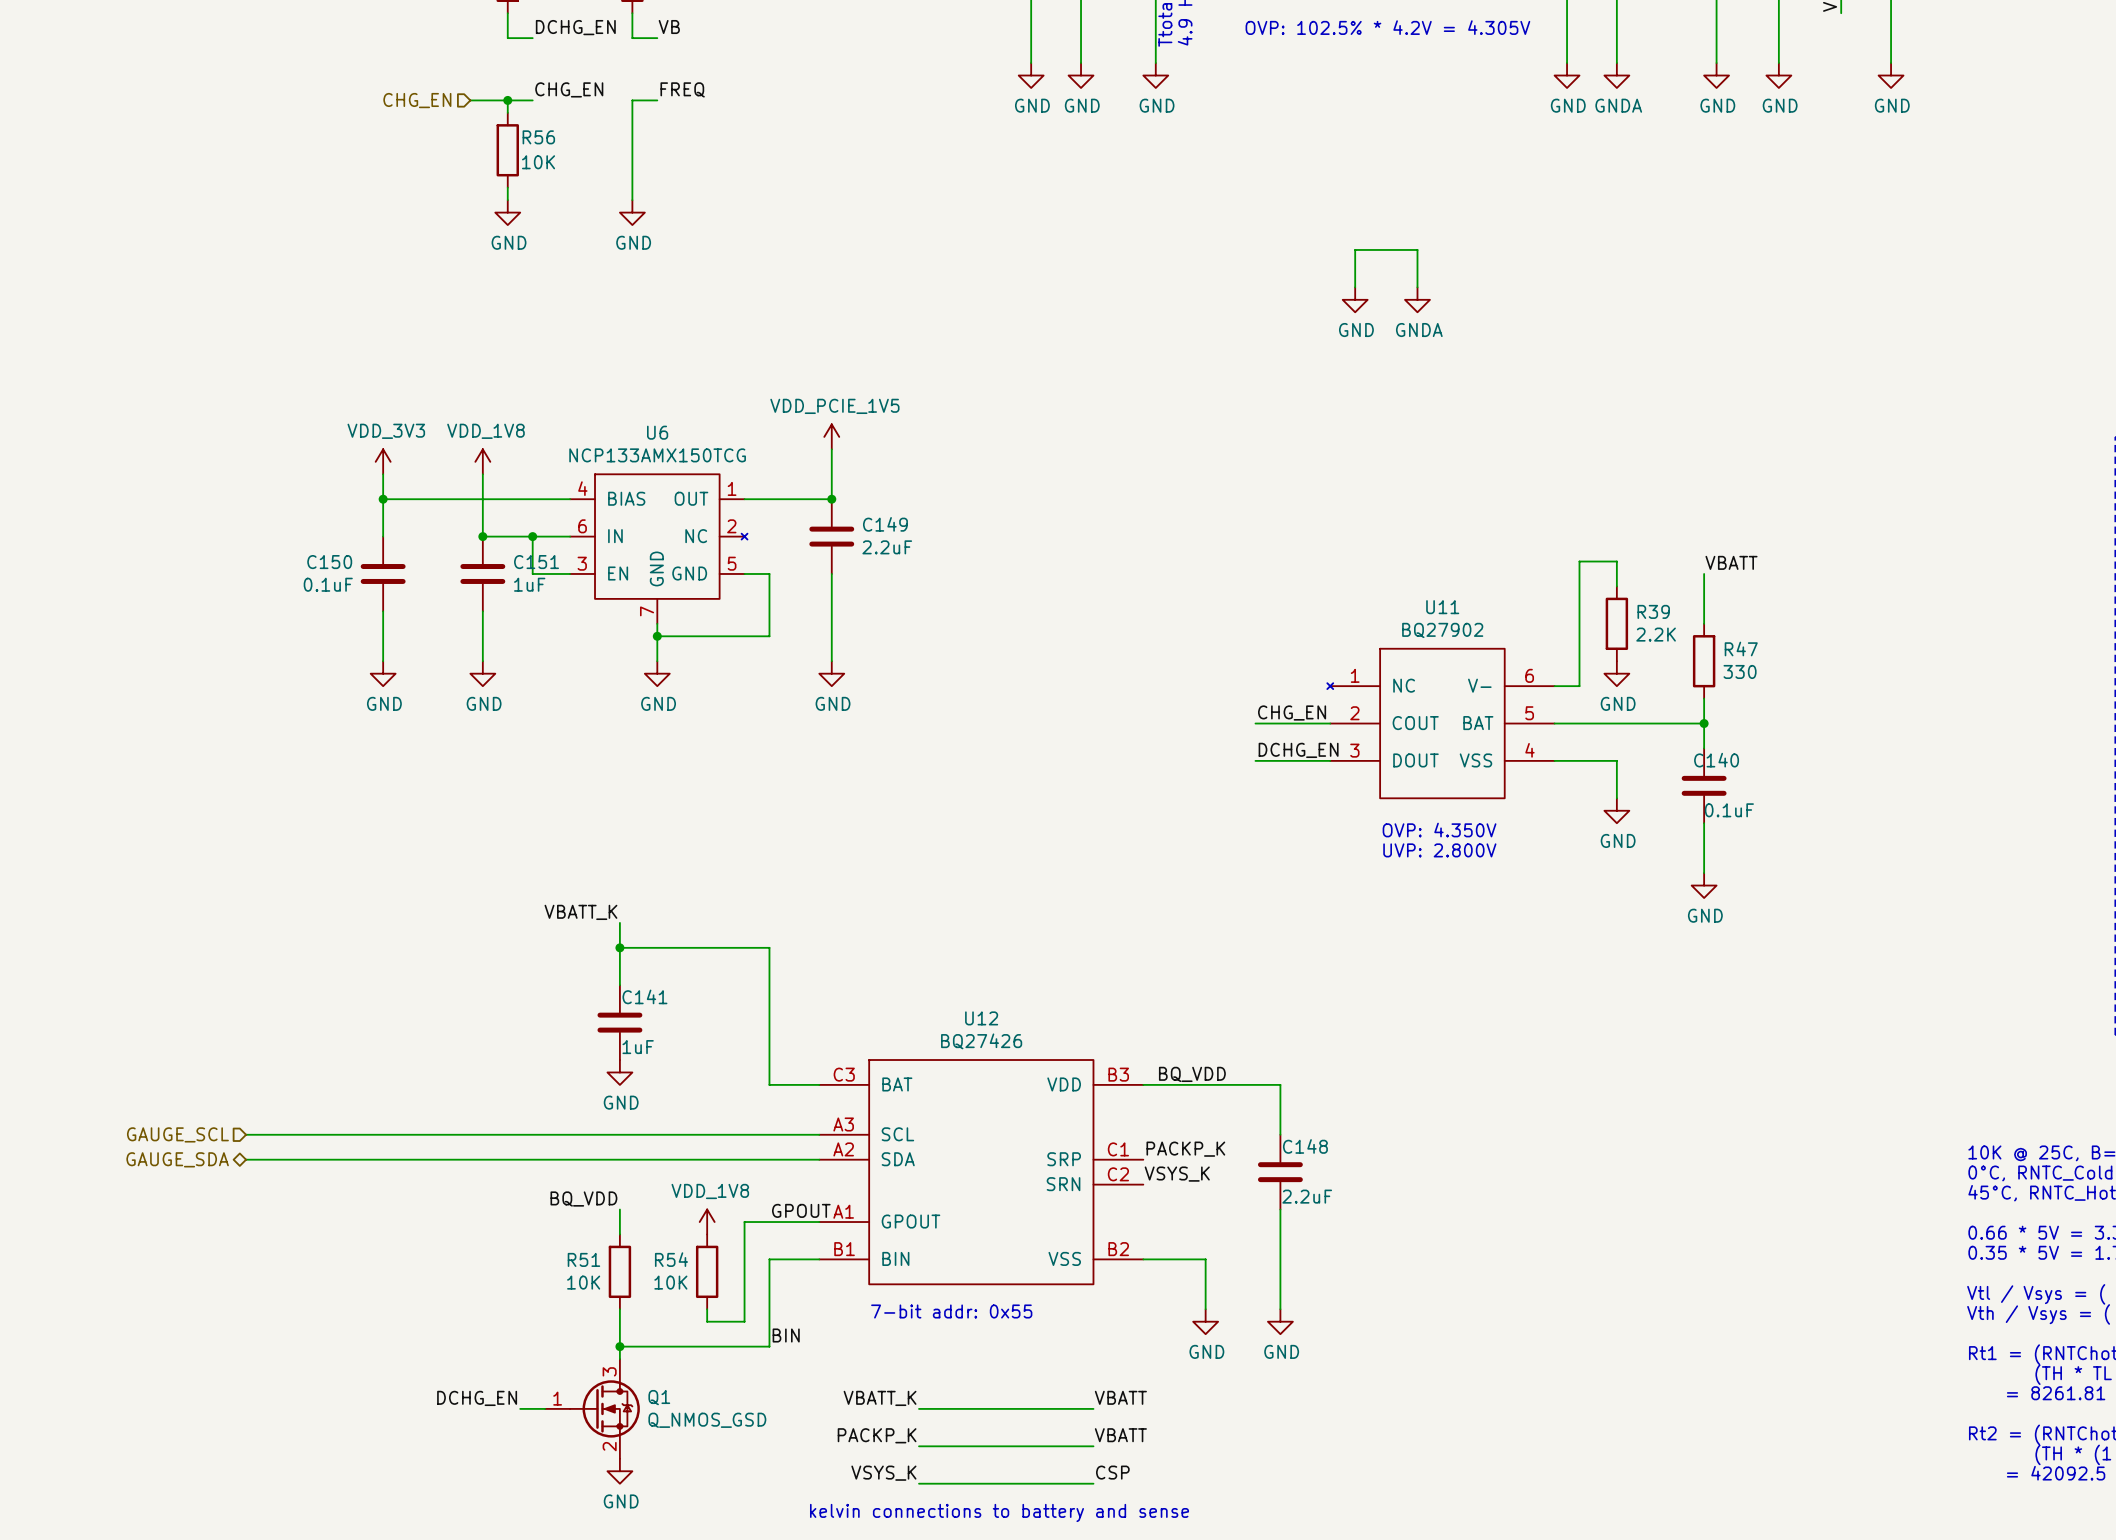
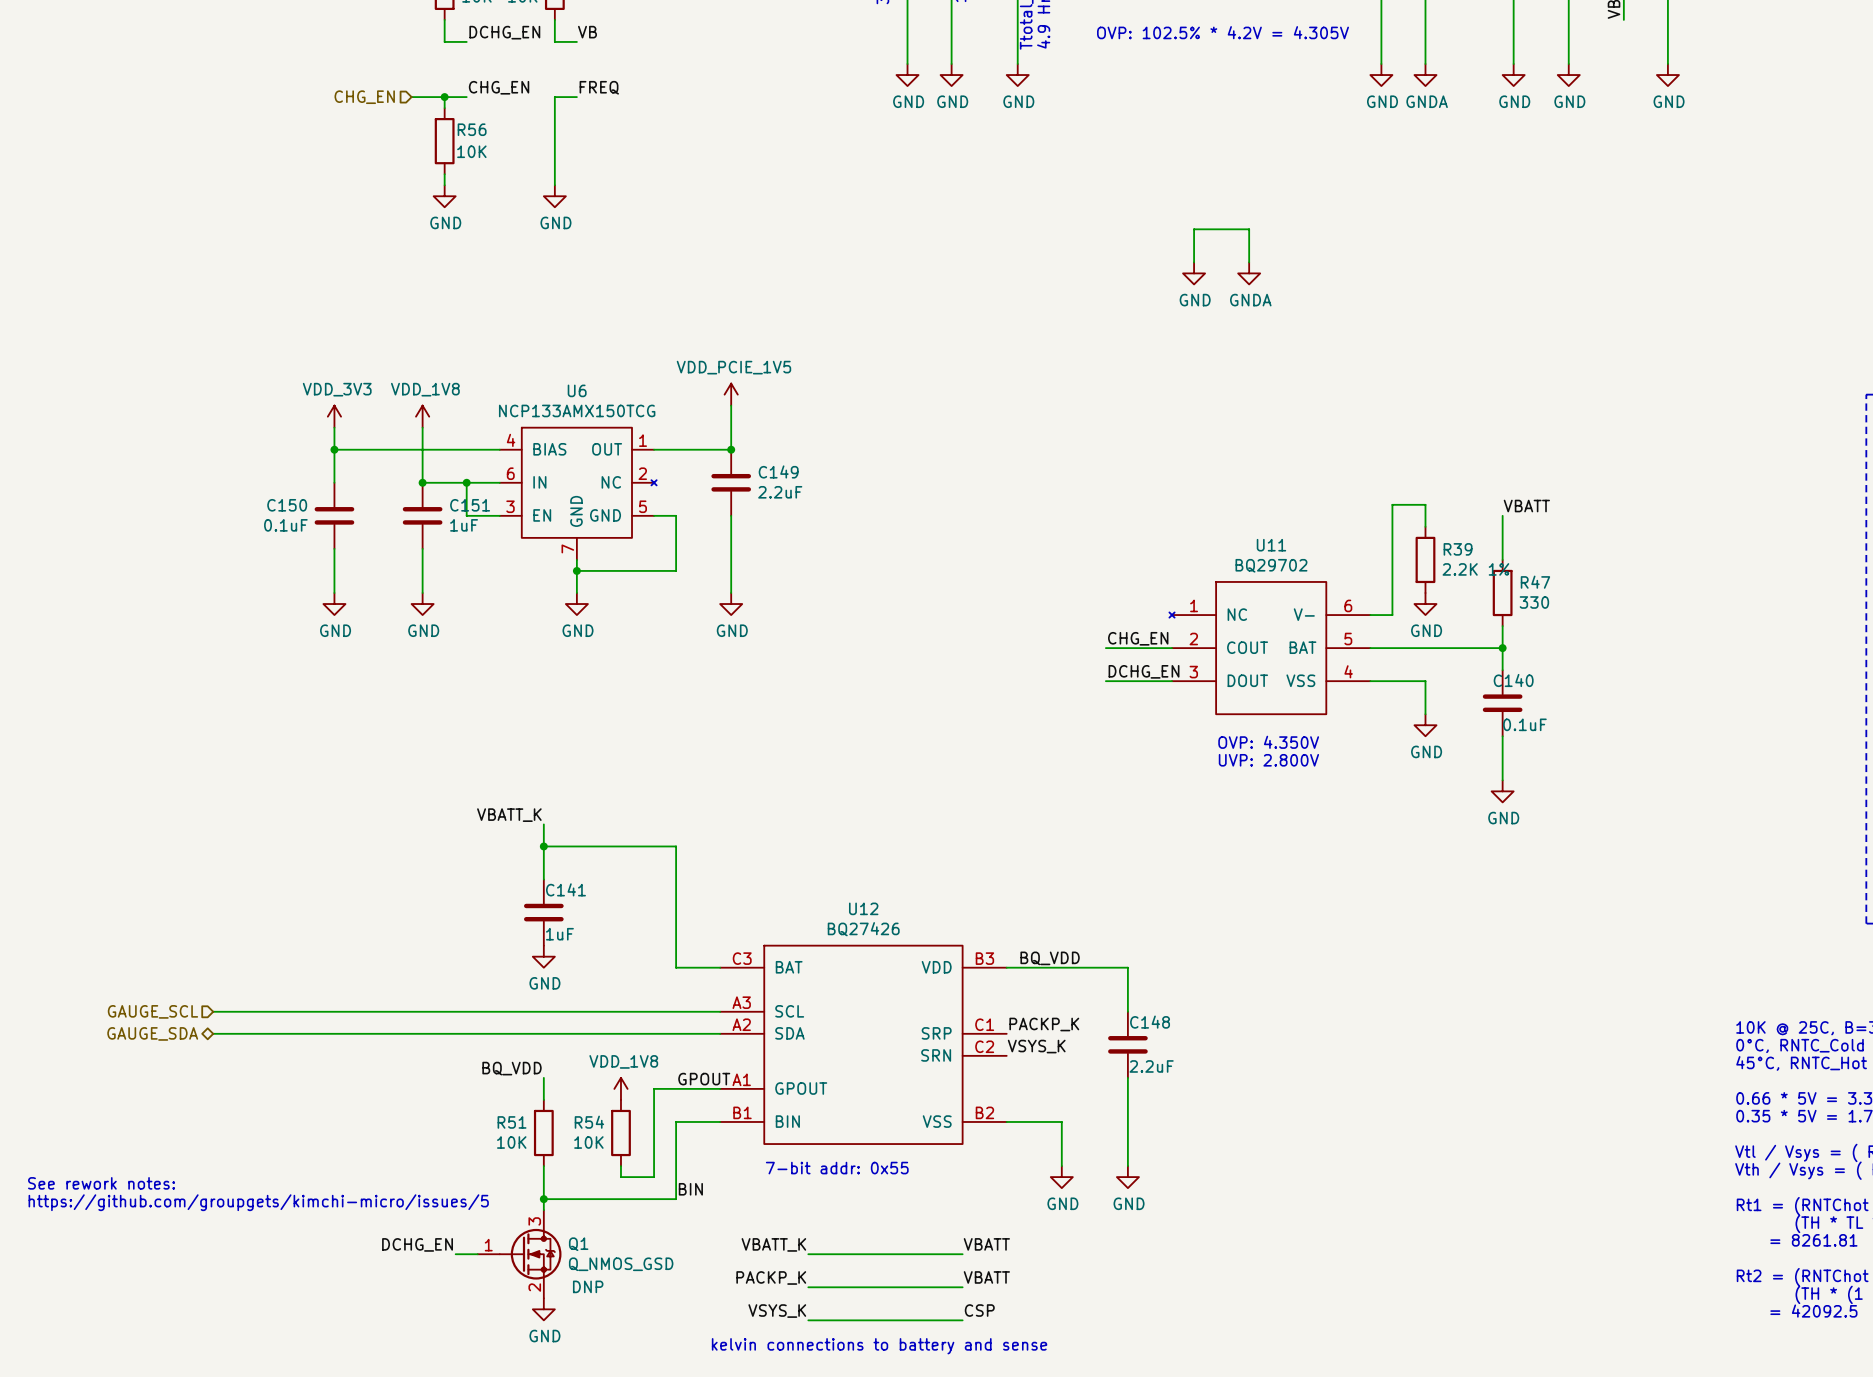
U11 value: BQ27902 (1442, 630) -> BQ29702 (1271, 565)
R39 value: 2.2K (1656, 634) -> 2.2K 1% (1475, 569)
text: none -> See rework notes: (101, 1183)
text: none -> https://github.com/groupgets/kimchi-micro/issues/5 (258, 1202)
Q1 text: none -> DNP (588, 1286)

